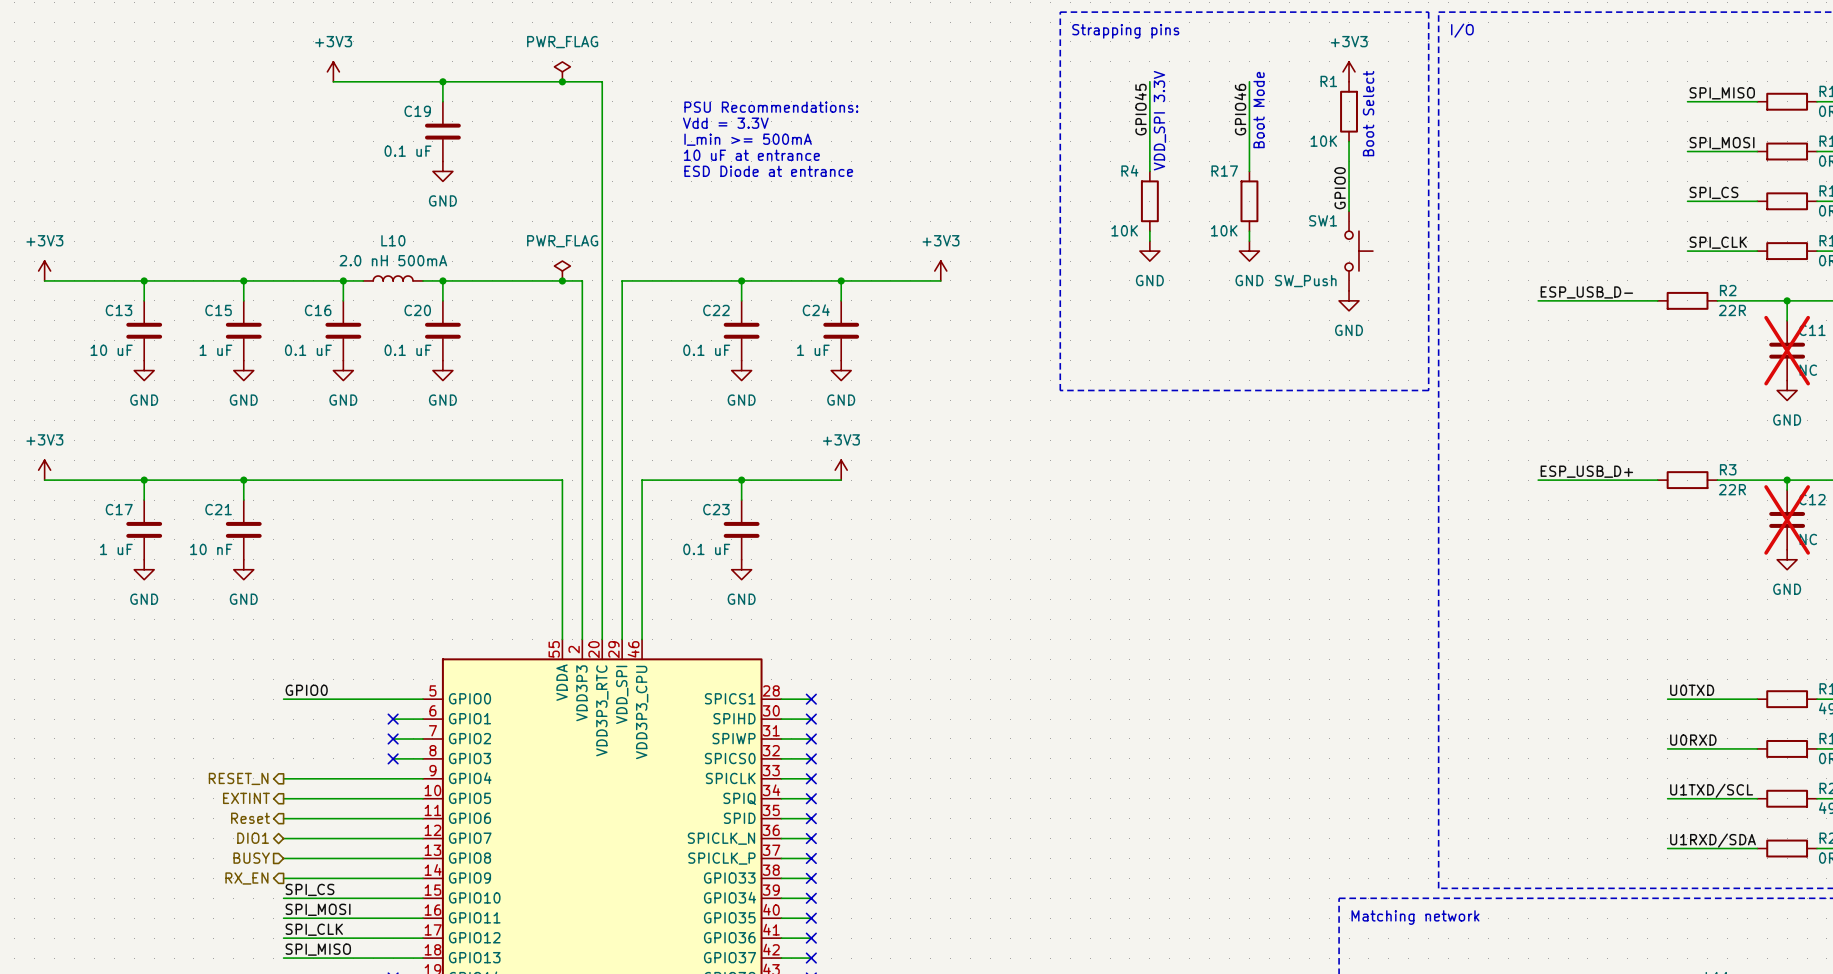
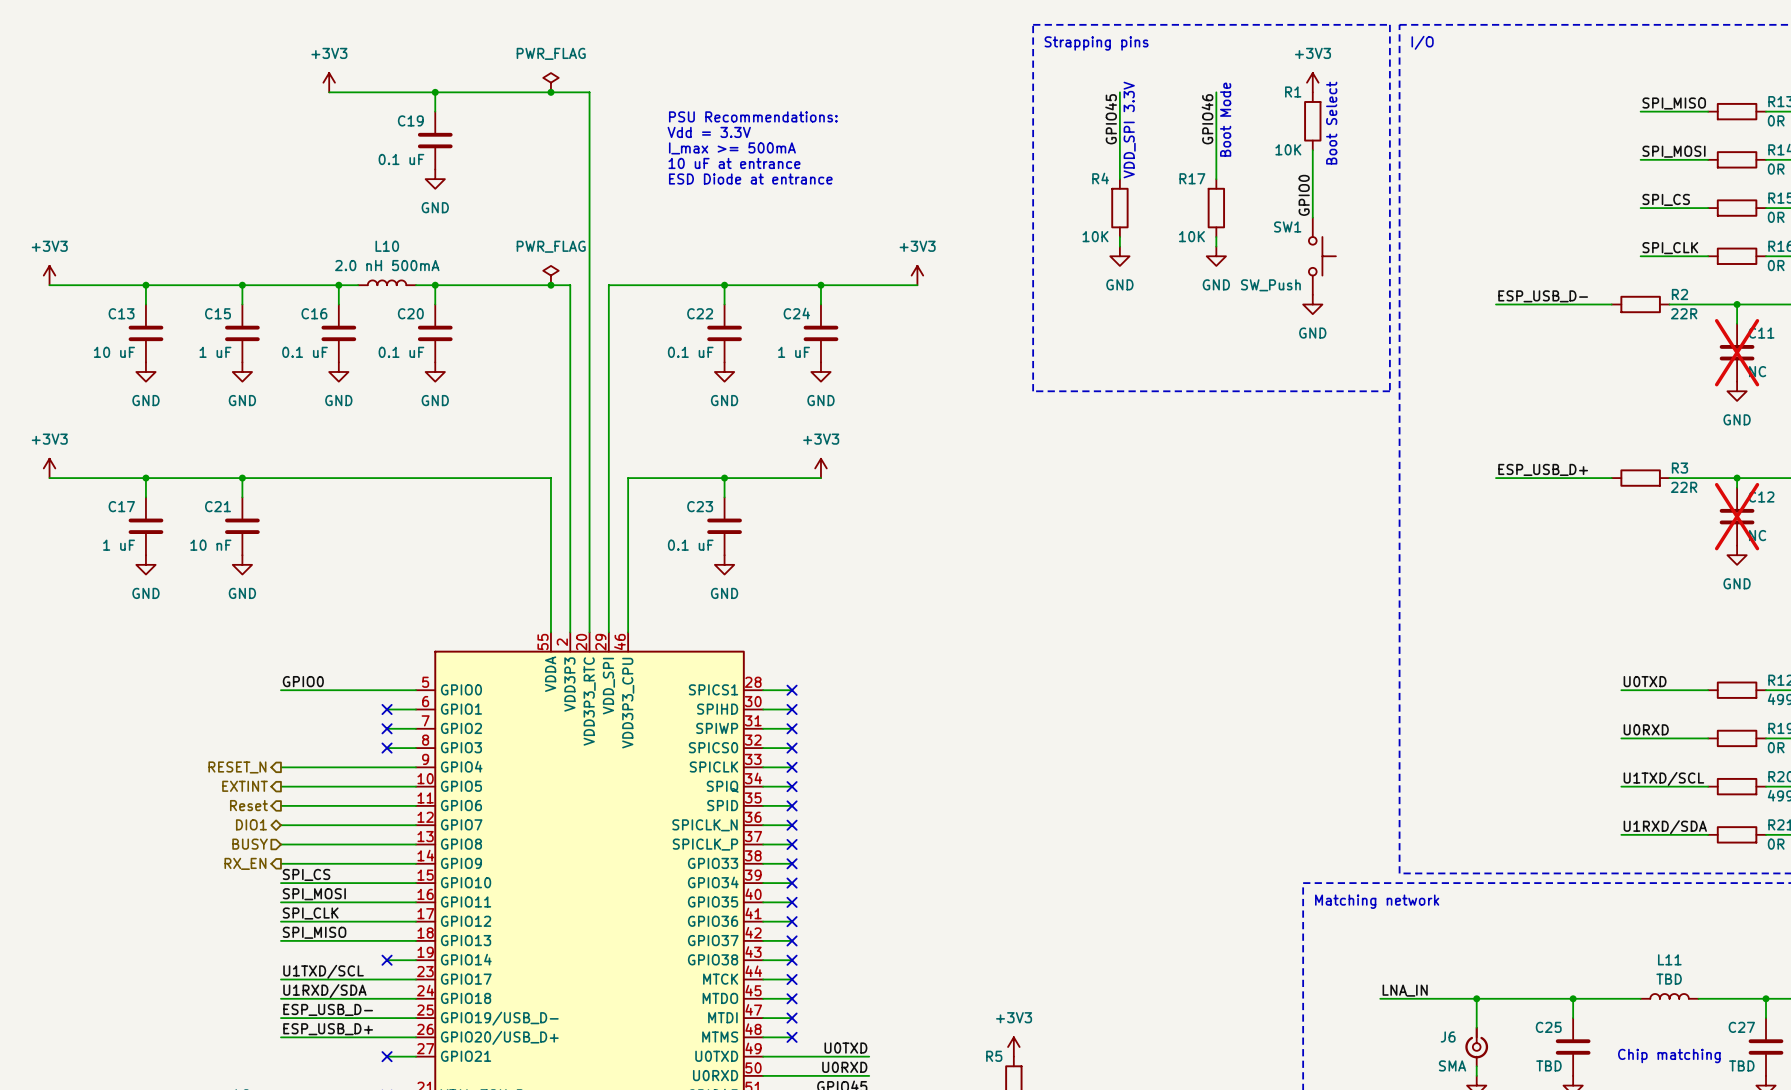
text: I_min >= 500mA (748, 139) -> I_max >= 500mA (732, 148)

